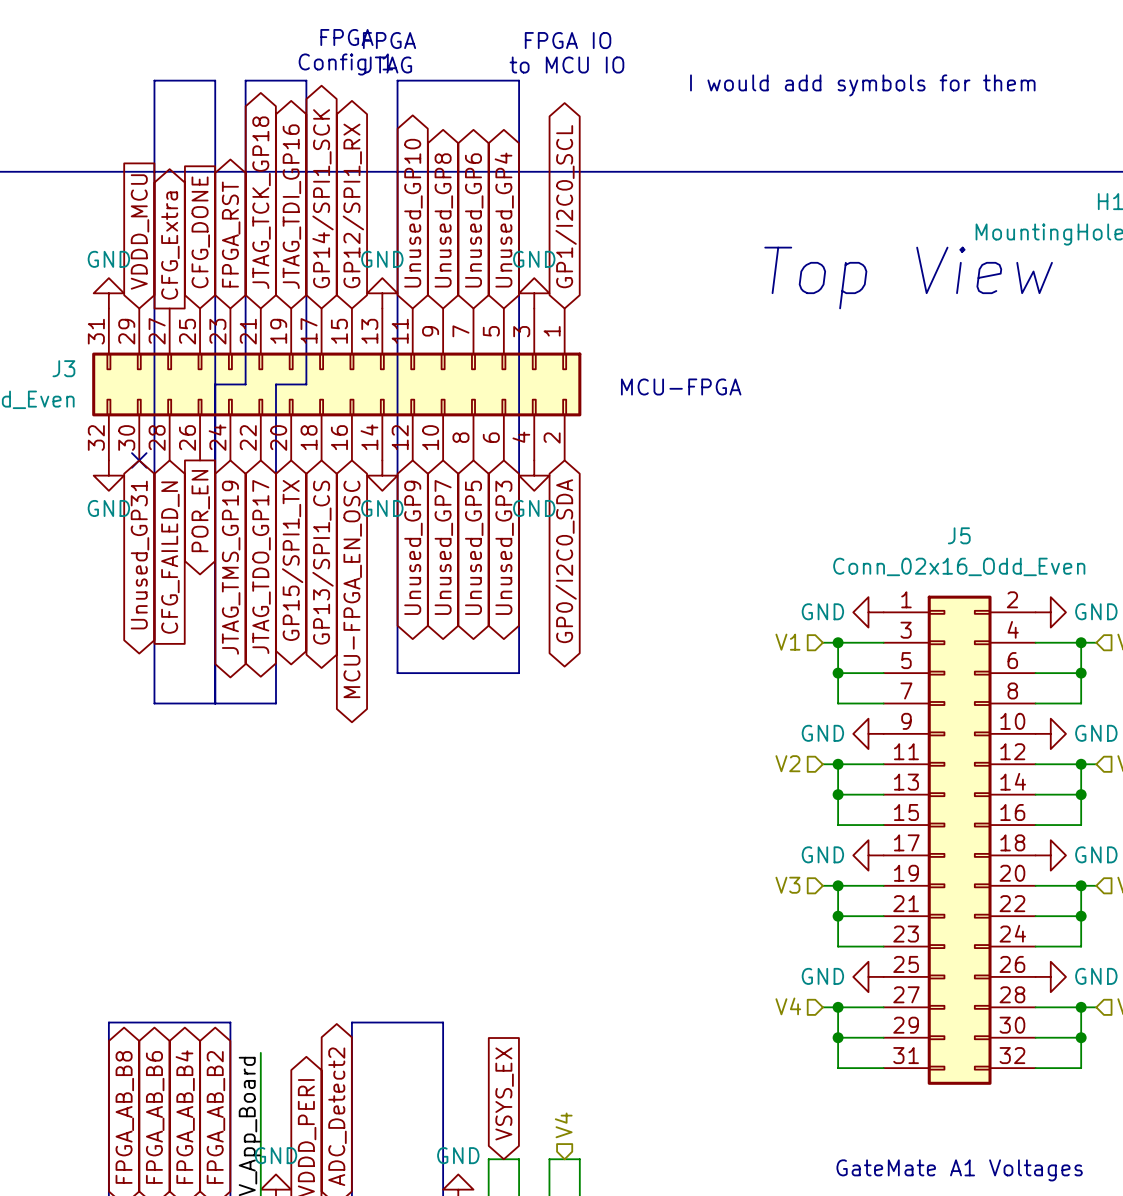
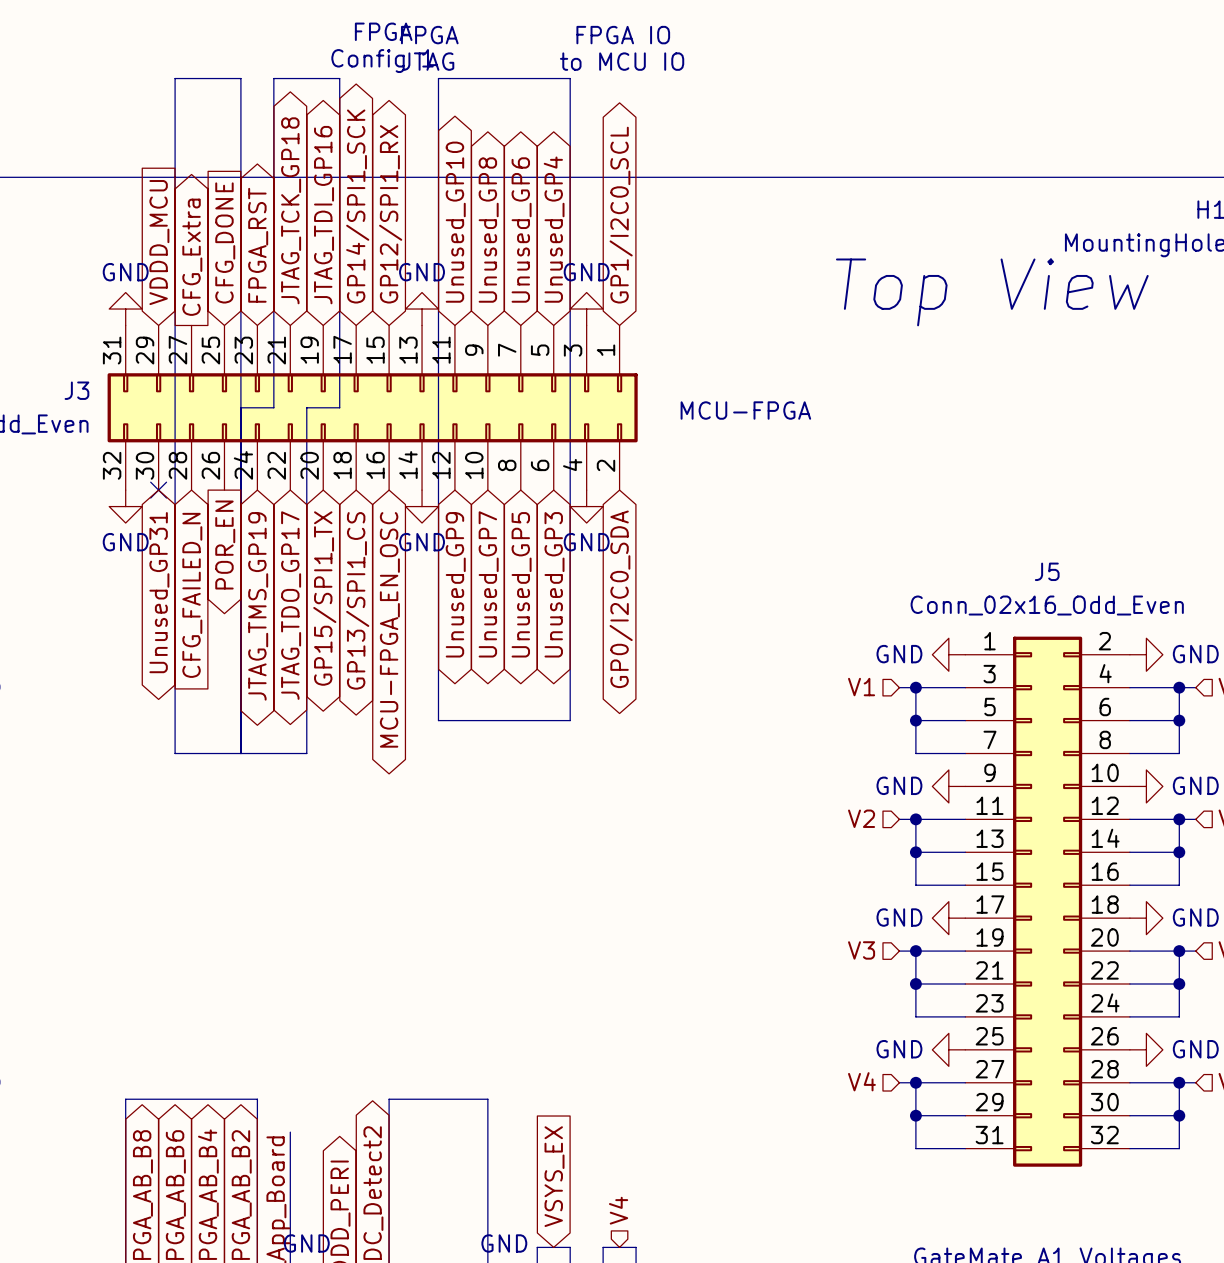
text: I would add symbols for them (862, 85) -> none

